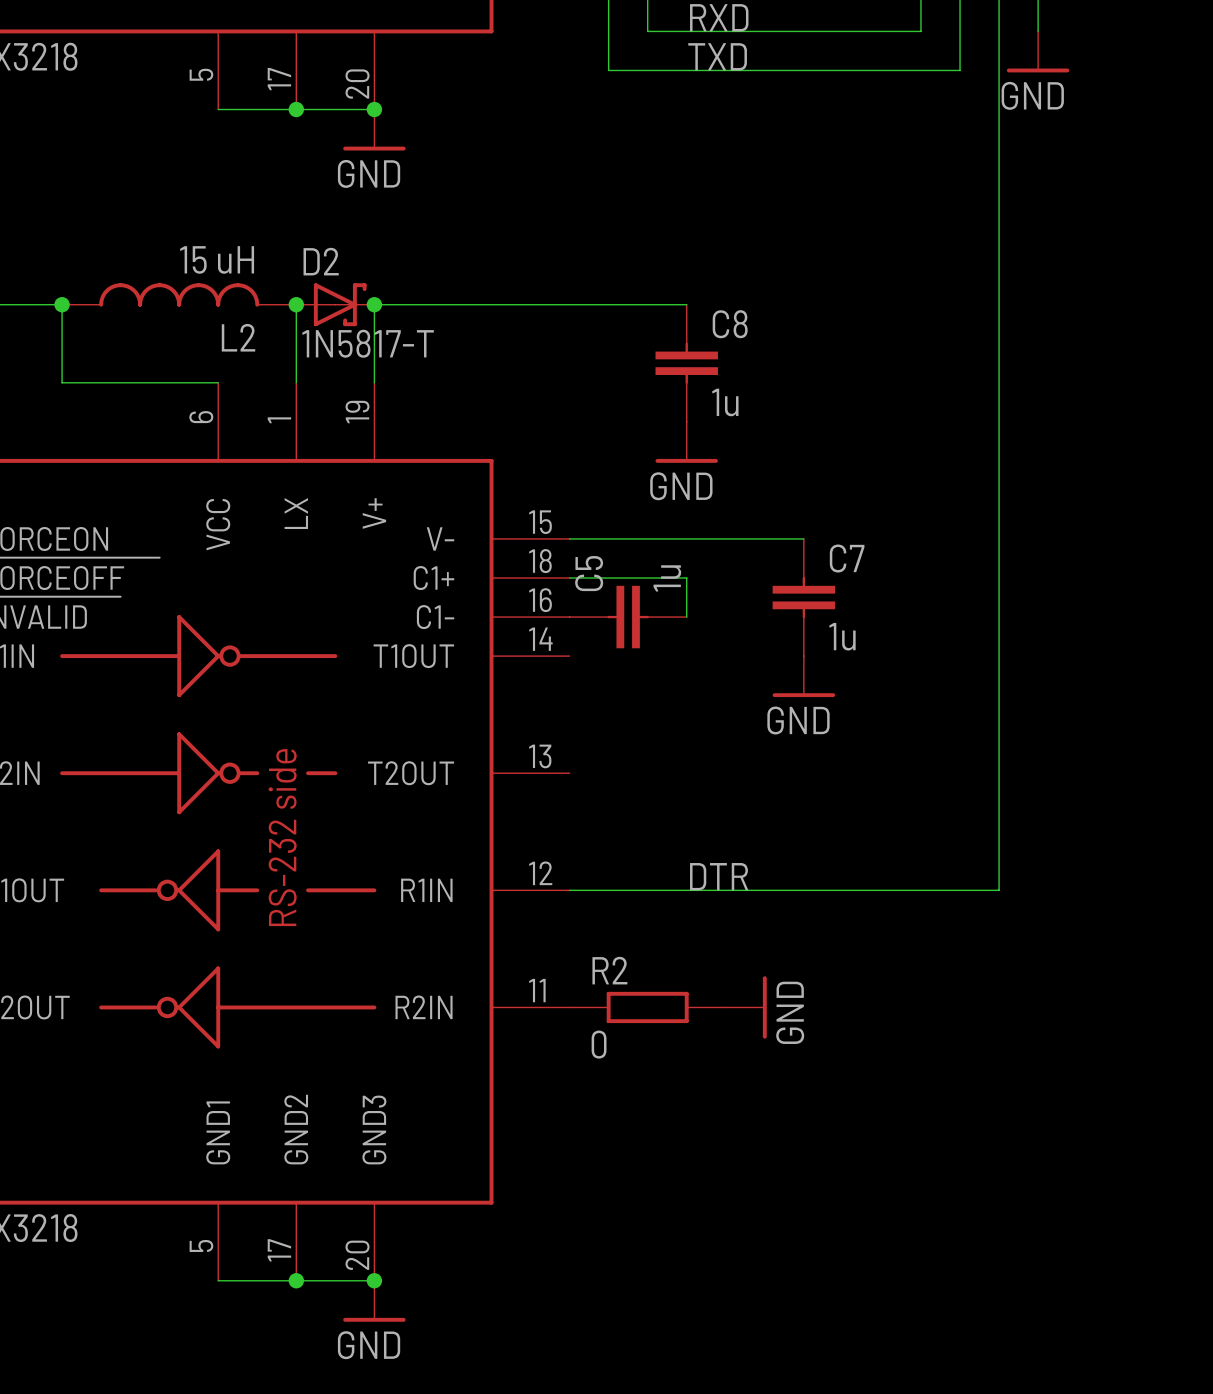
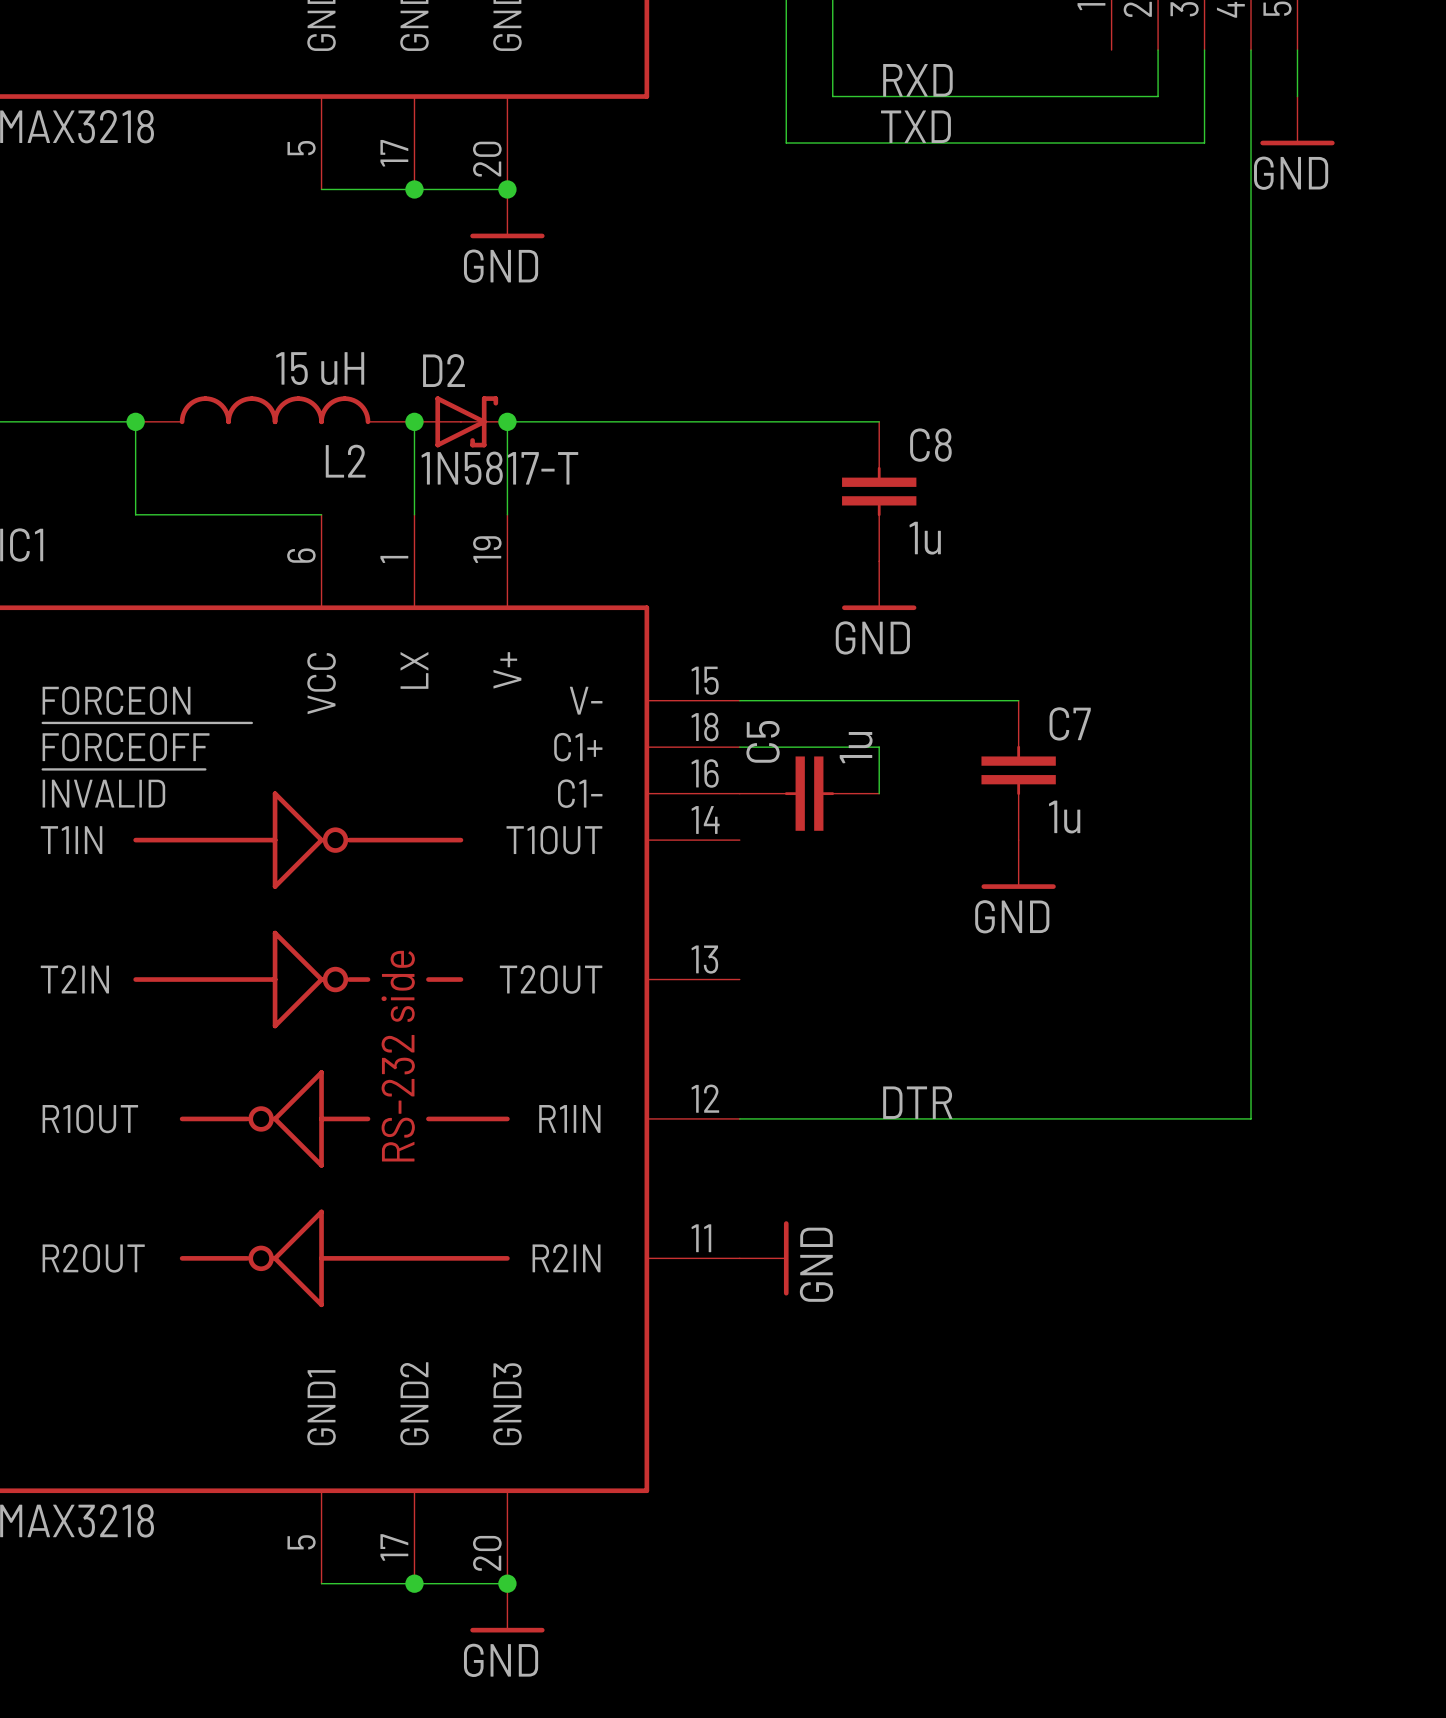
R2: 0 (647, 1007) -> none
power symbol position: GND (746, 1007) -> GND (764, 1258)

